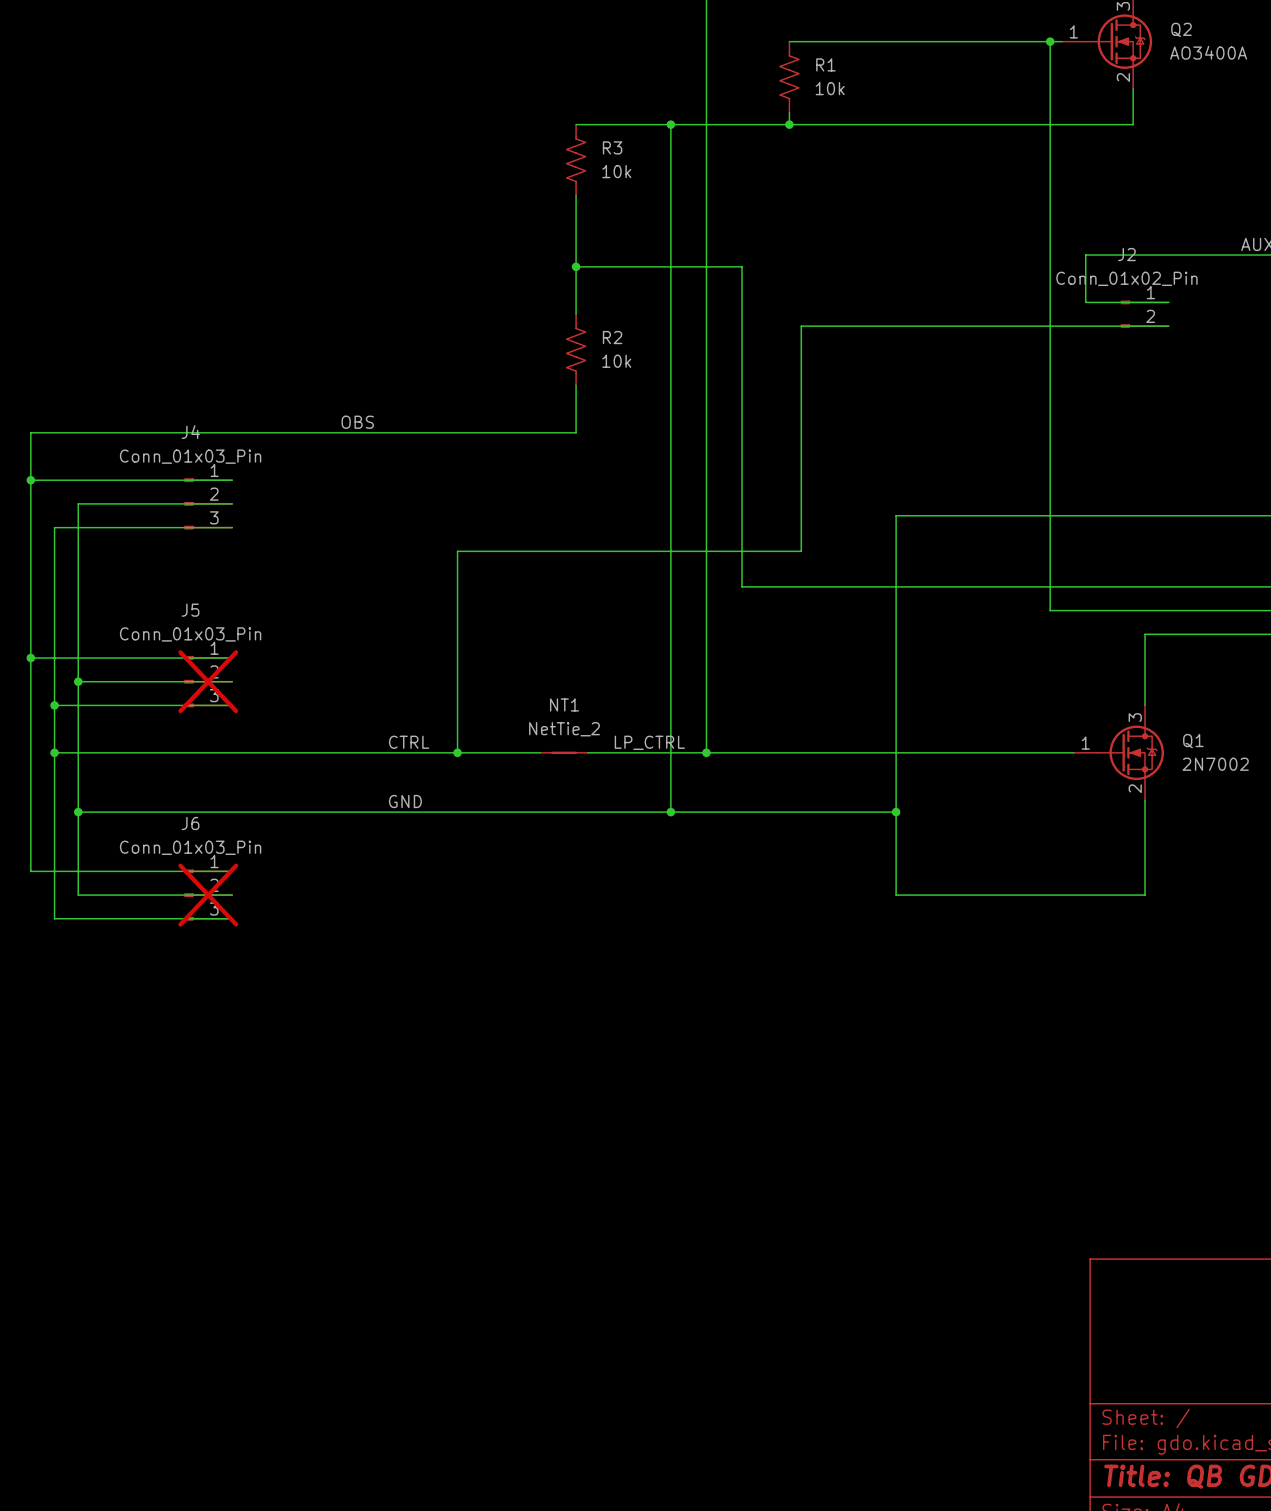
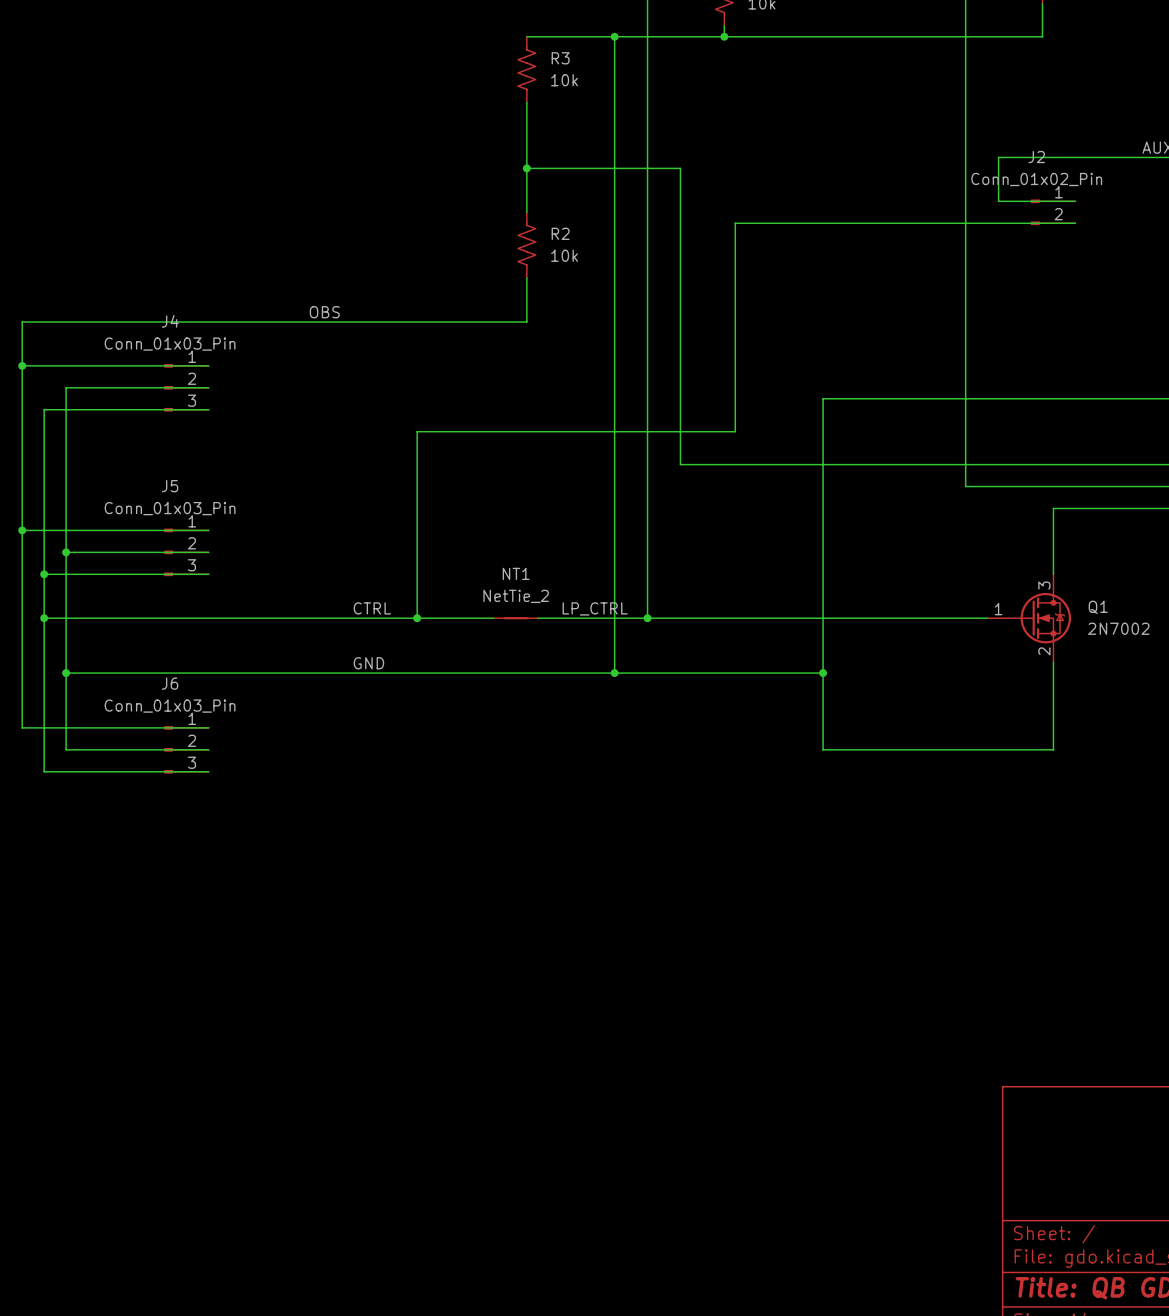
J5 do-not-place cross: (208, 681) -> none
J6 do-not-place cross: (208, 895) -> none

